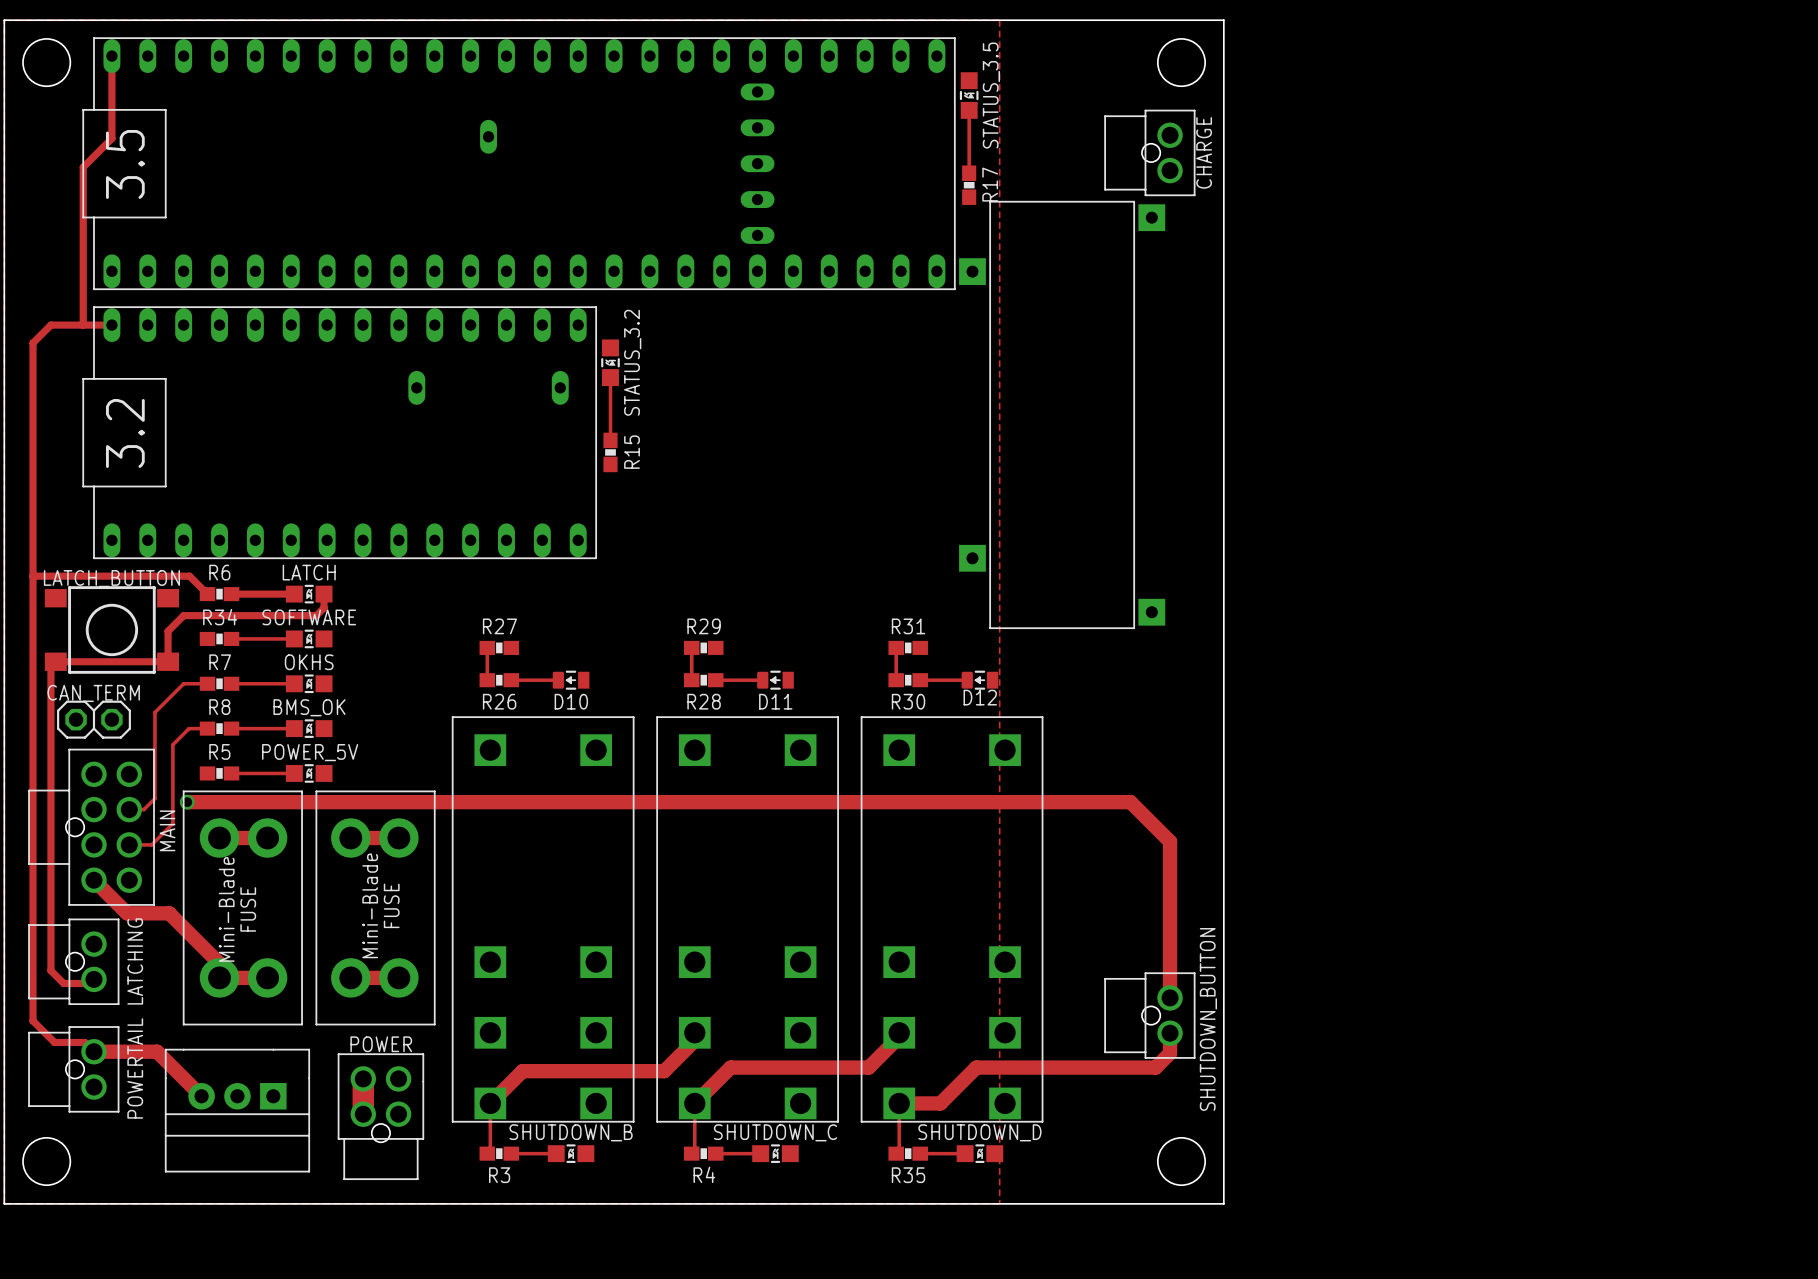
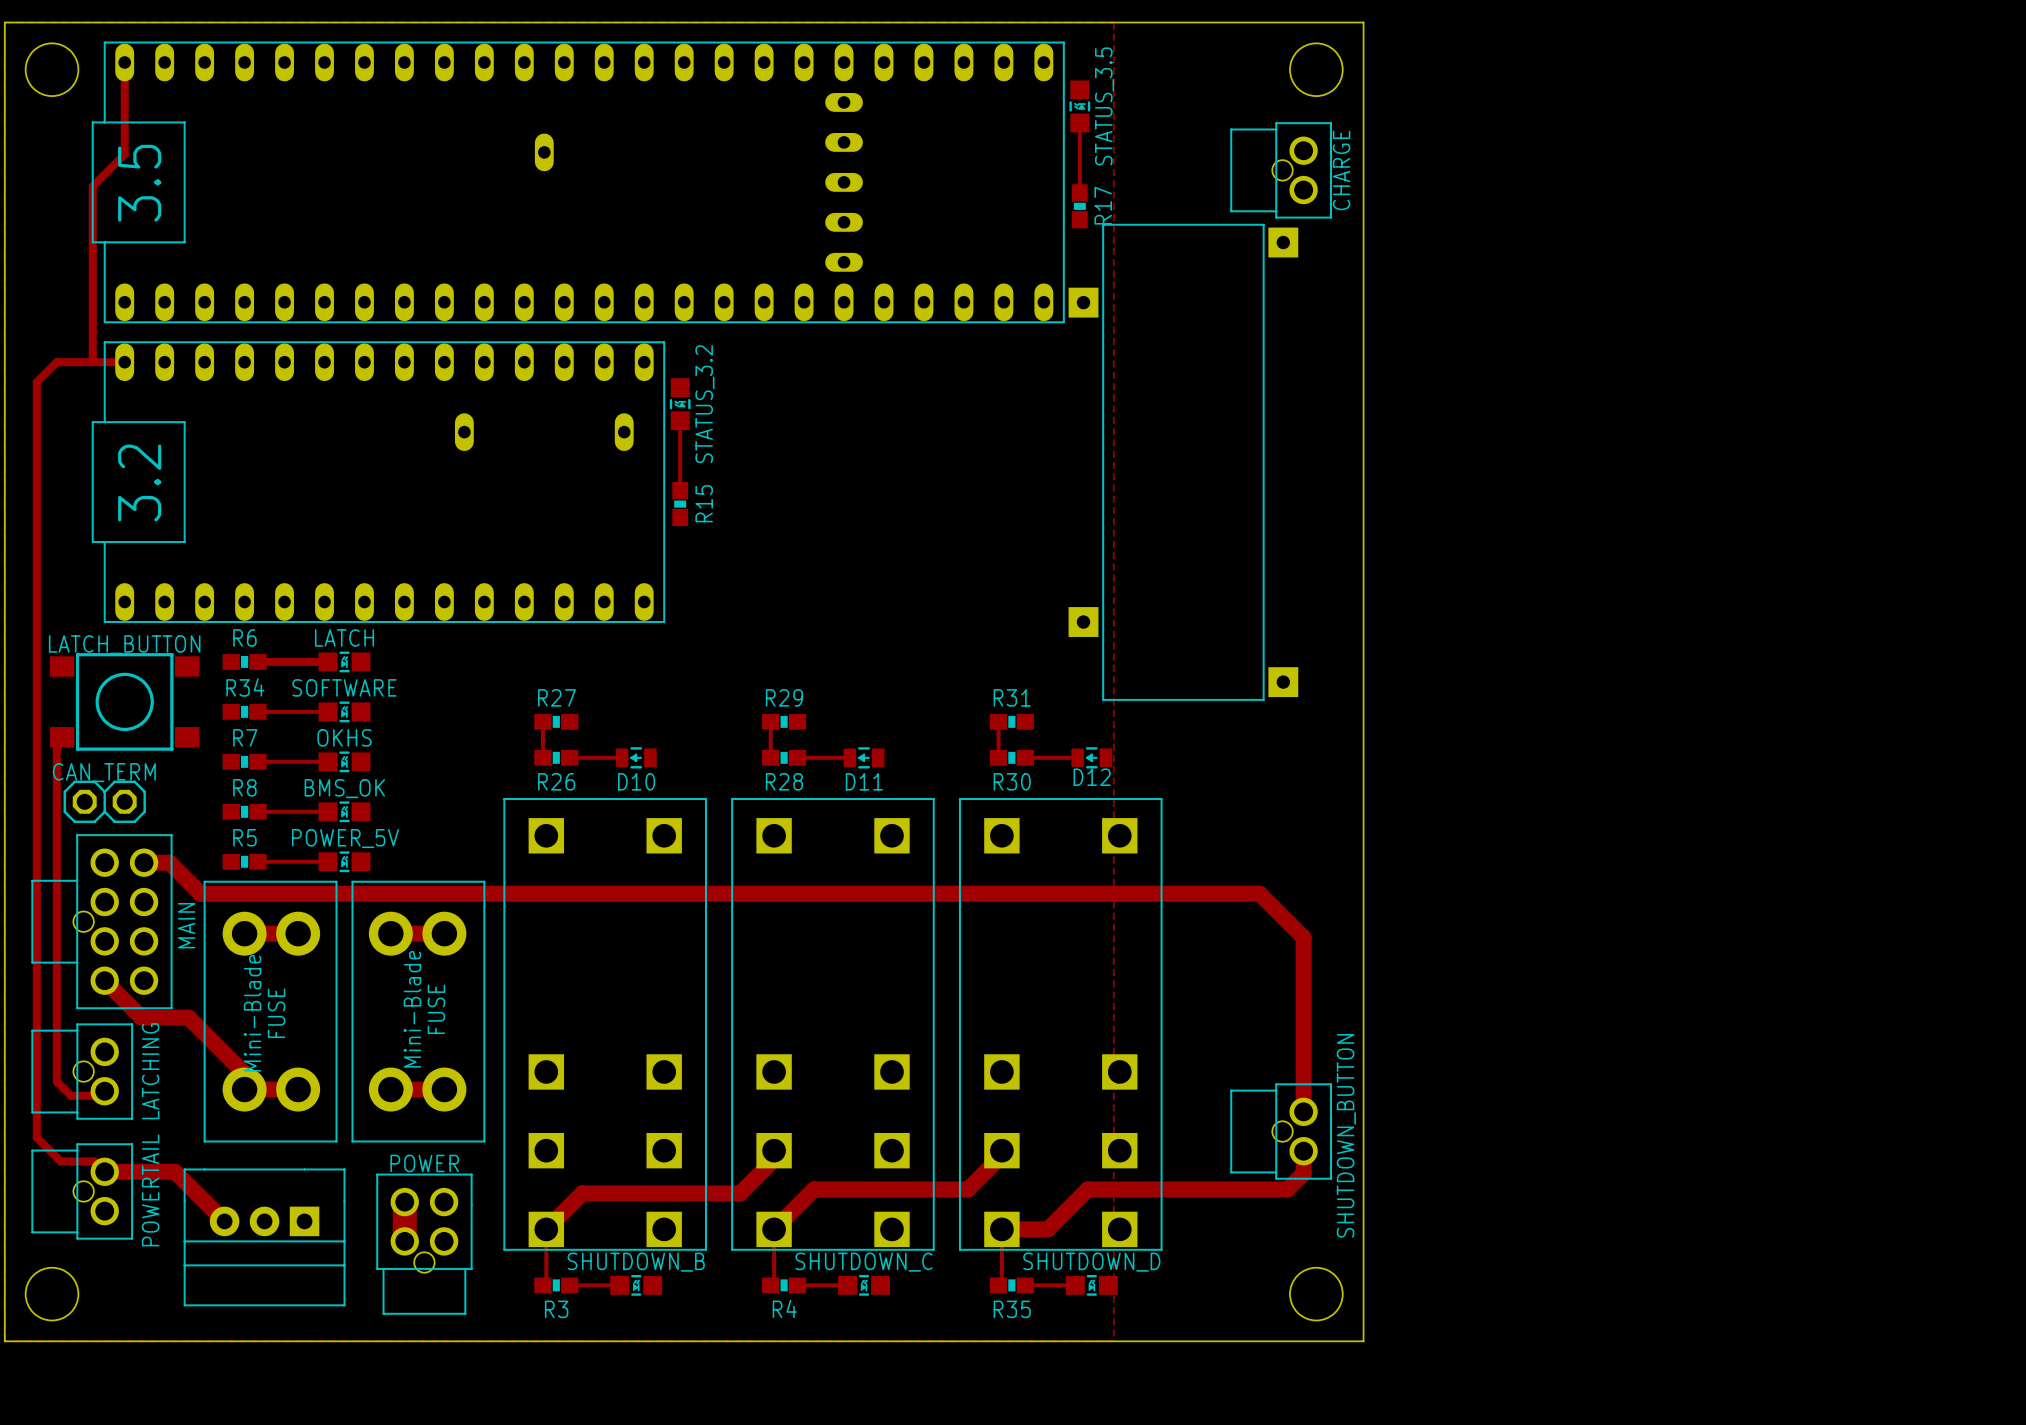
track: (33, 576) (189, 576) (207, 594) -> none
track: (324, 594) (324, 607) (316, 615) (183, 615) (168, 631) (168, 661) (55, 661) -> none
track: (207, 683) (183, 683) (154, 712) (154, 798) (143, 809) (129, 809) -> none
track: (207, 728) (189, 728) (172, 744) (172, 823) (151, 844) (129, 844) -> none
track: none -> (144, 862) (169, 862) (200, 893) (208, 893)
via: (187, 802) -> none

